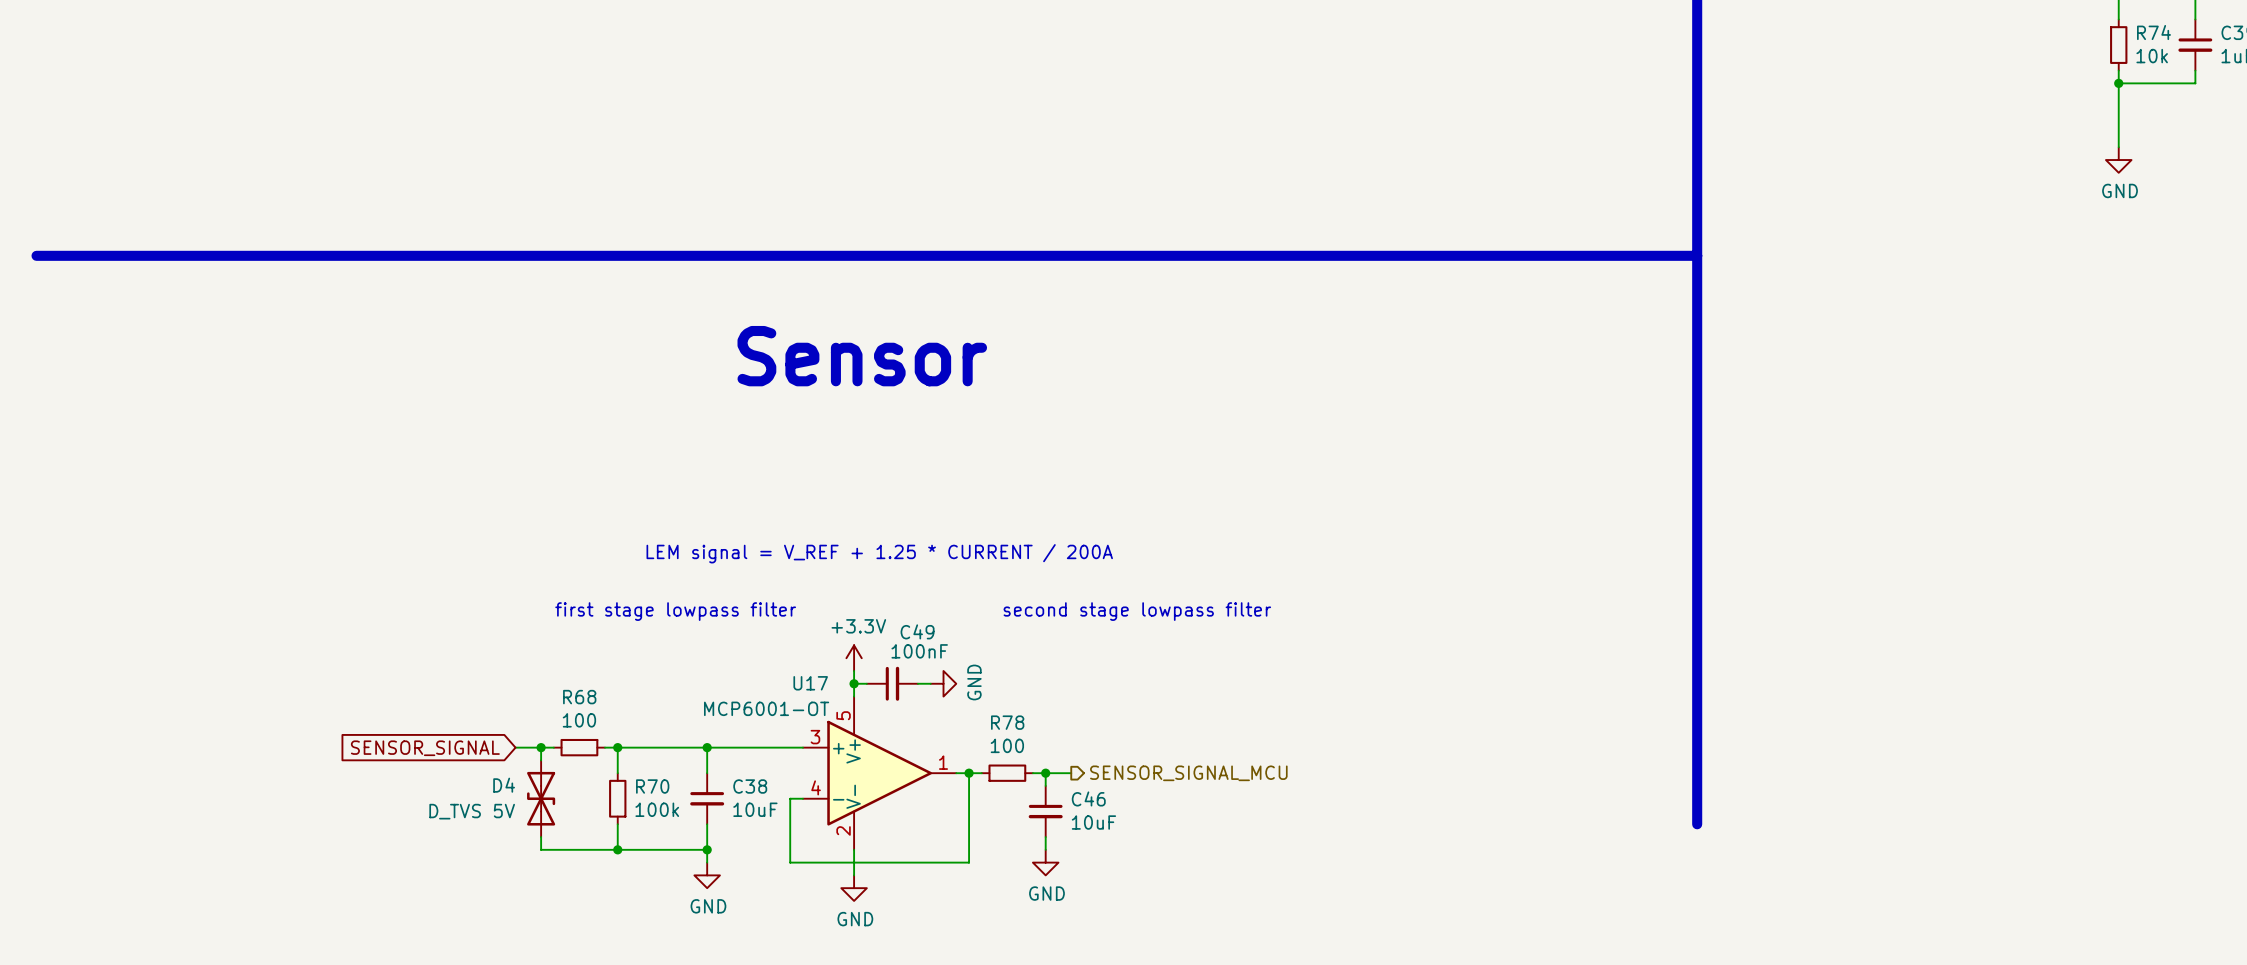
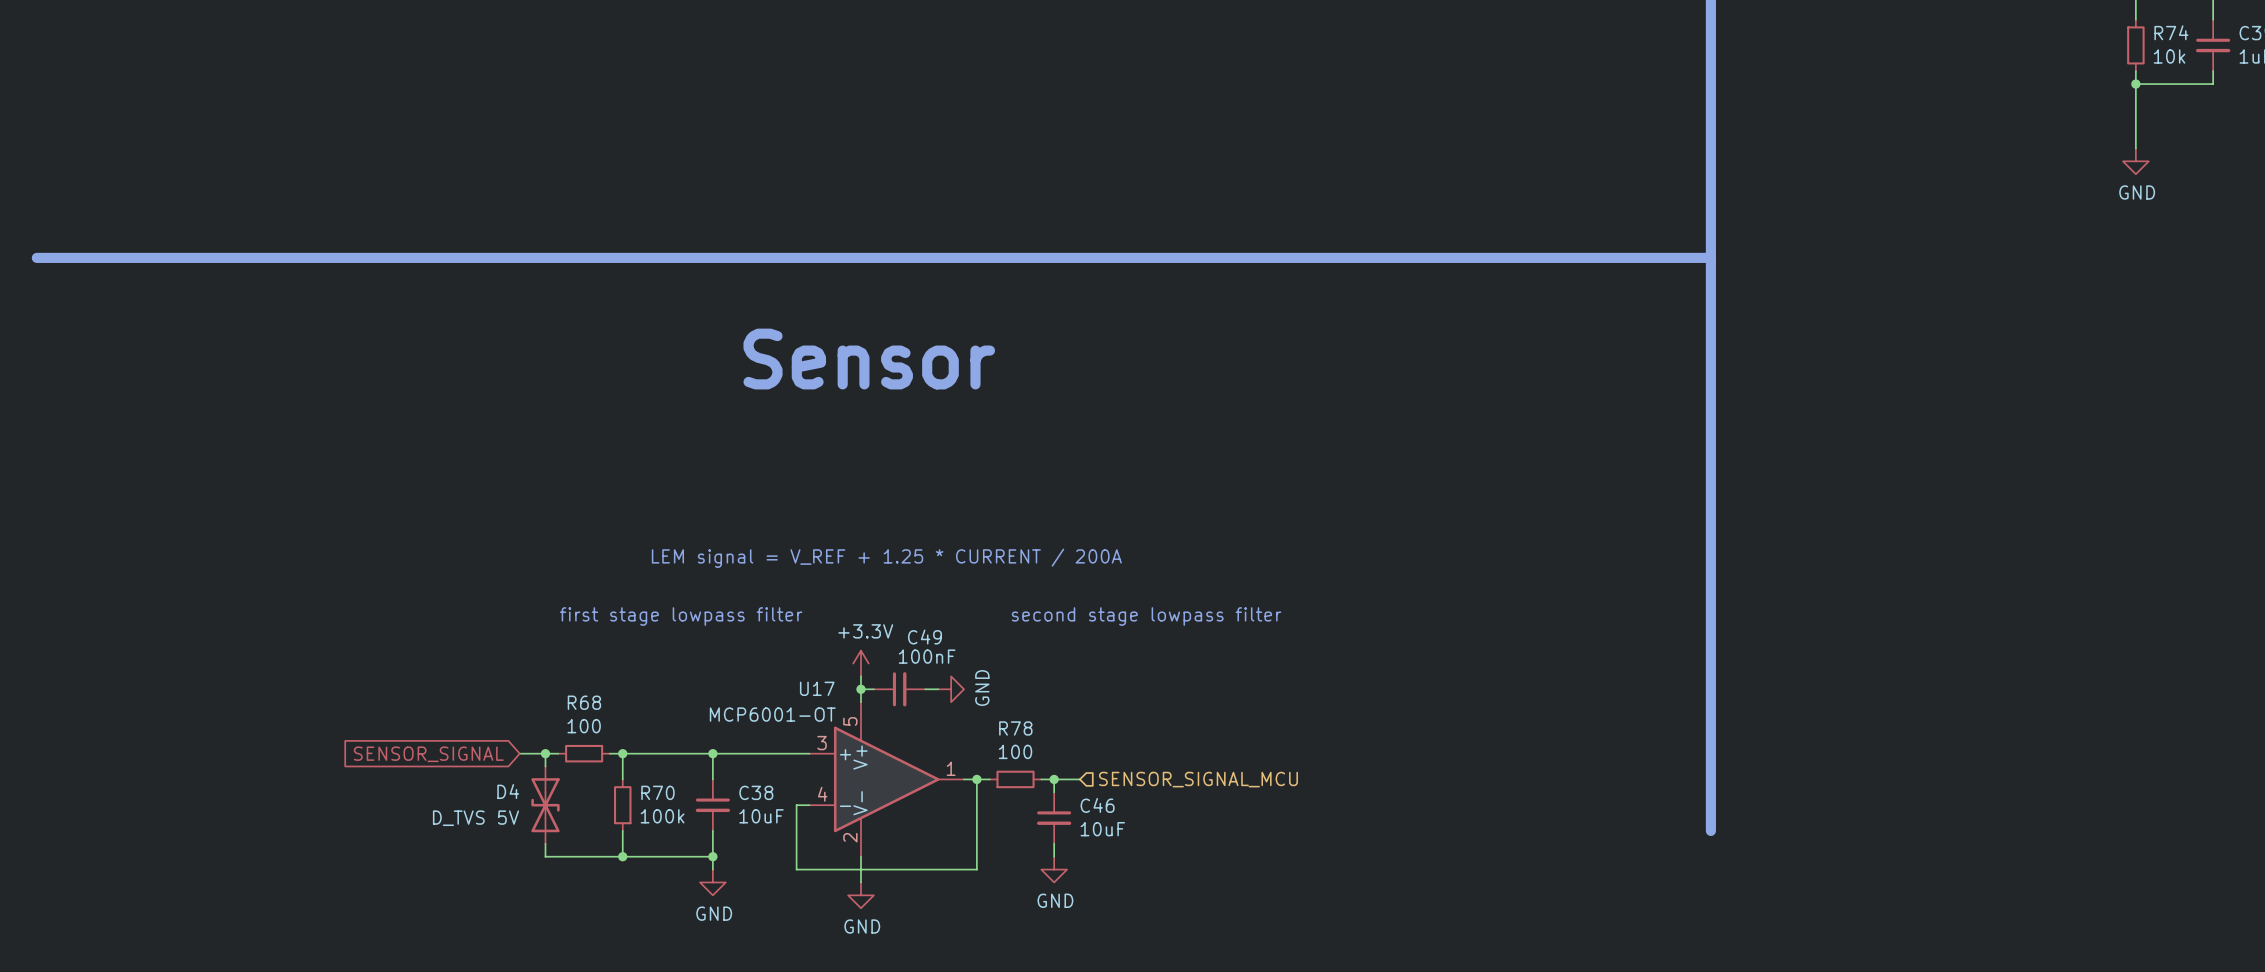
hierarchical label shape: output (1188, 773) -> input (1198, 779)

